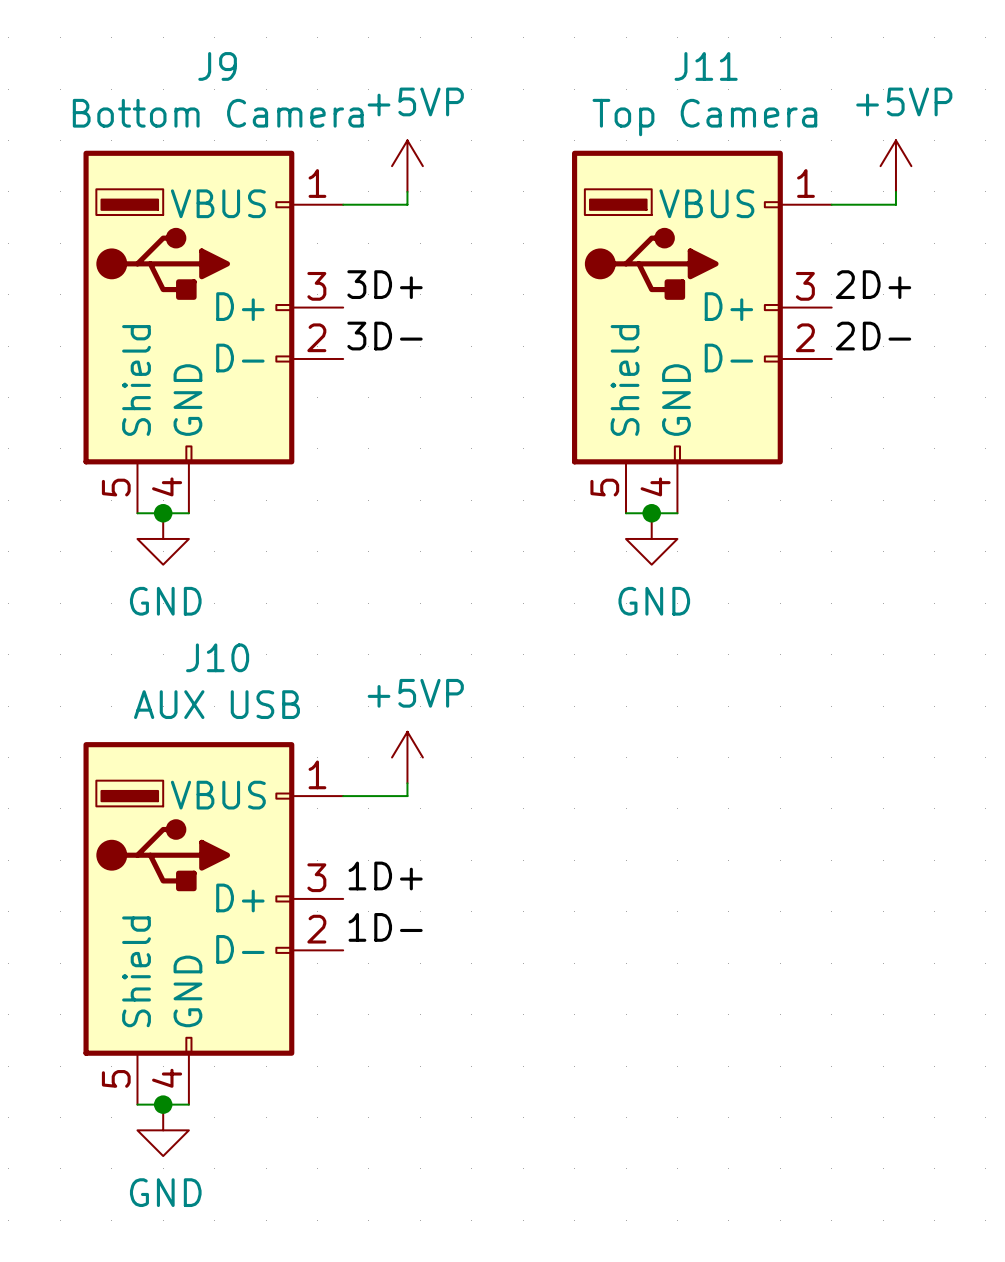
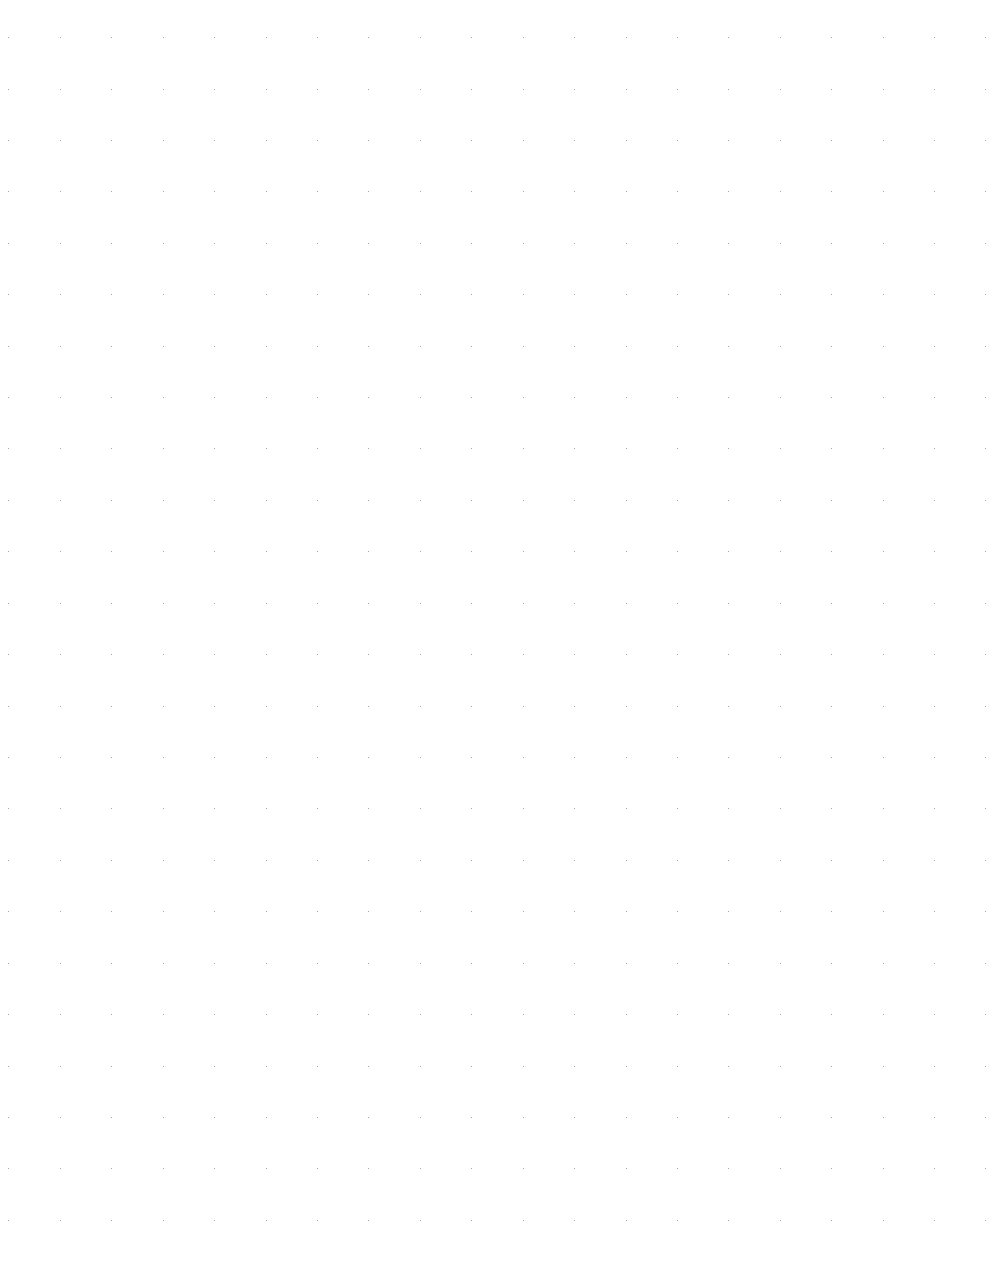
power symbol: +5VP (407, 166) -> none
power symbol: +5VP (895, 166) -> none
wire: (407, 191) (407, 204) (343, 204) -> none
wire: (895, 191) (895, 204) (831, 204) -> none
label: 3D+ (384, 284) -> none
label: 2D+ (873, 284) -> none
J9: Bottom Camera (213, 331) -> none
J11: Top Camera (701, 331) -> none
label: 3D- (384, 336) -> none
label: 2D- (873, 336) -> none
wire: (137, 513) (188, 513) -> none
junction: (163, 513) -> none
wire: (626, 513) (677, 513) -> none
junction: (651, 513) -> none
power symbol: GND (163, 538) -> none
power symbol: GND (651, 538) -> none
power symbol: +5VP (407, 757) -> none
wire: (407, 783) (407, 796) (343, 796) -> none
label: 1D+ (385, 875) -> none
J10: AUX USB (213, 923) -> none
label: 1D- (385, 927) -> none
wire: (137, 1104) (188, 1104) -> none
junction: (163, 1104) -> none
power symbol: GND (163, 1130) -> none

